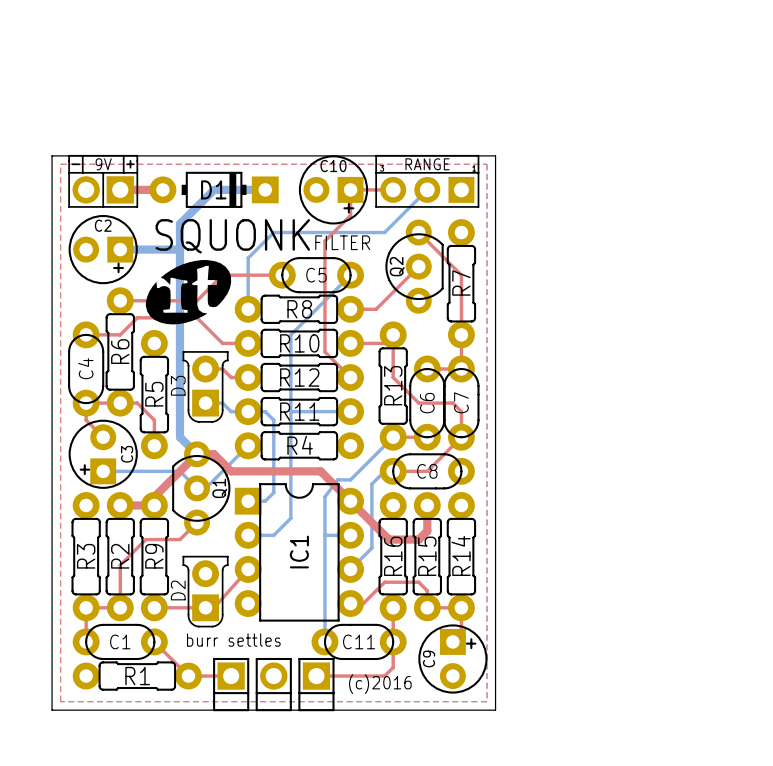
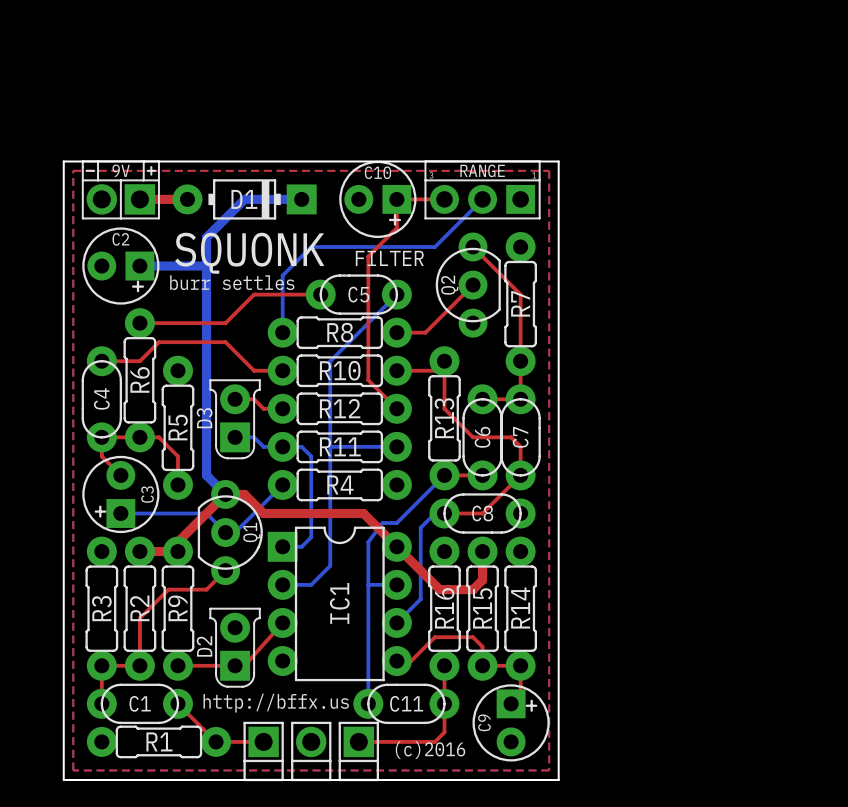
drawing: [145, 260, 232, 325] -> none
text: none -> burr settles (232, 282)
text: burr settles (233, 640) -> http://bffx.us (276, 703)

